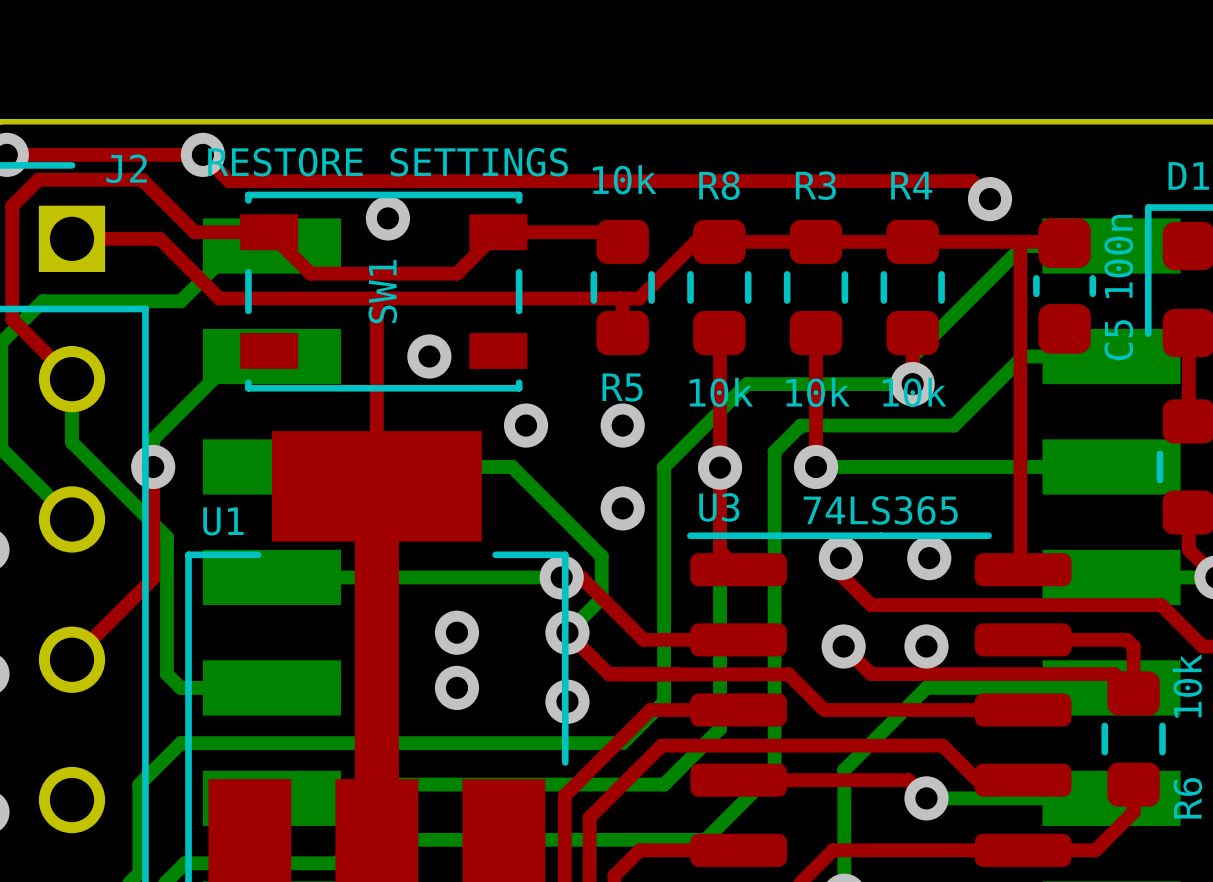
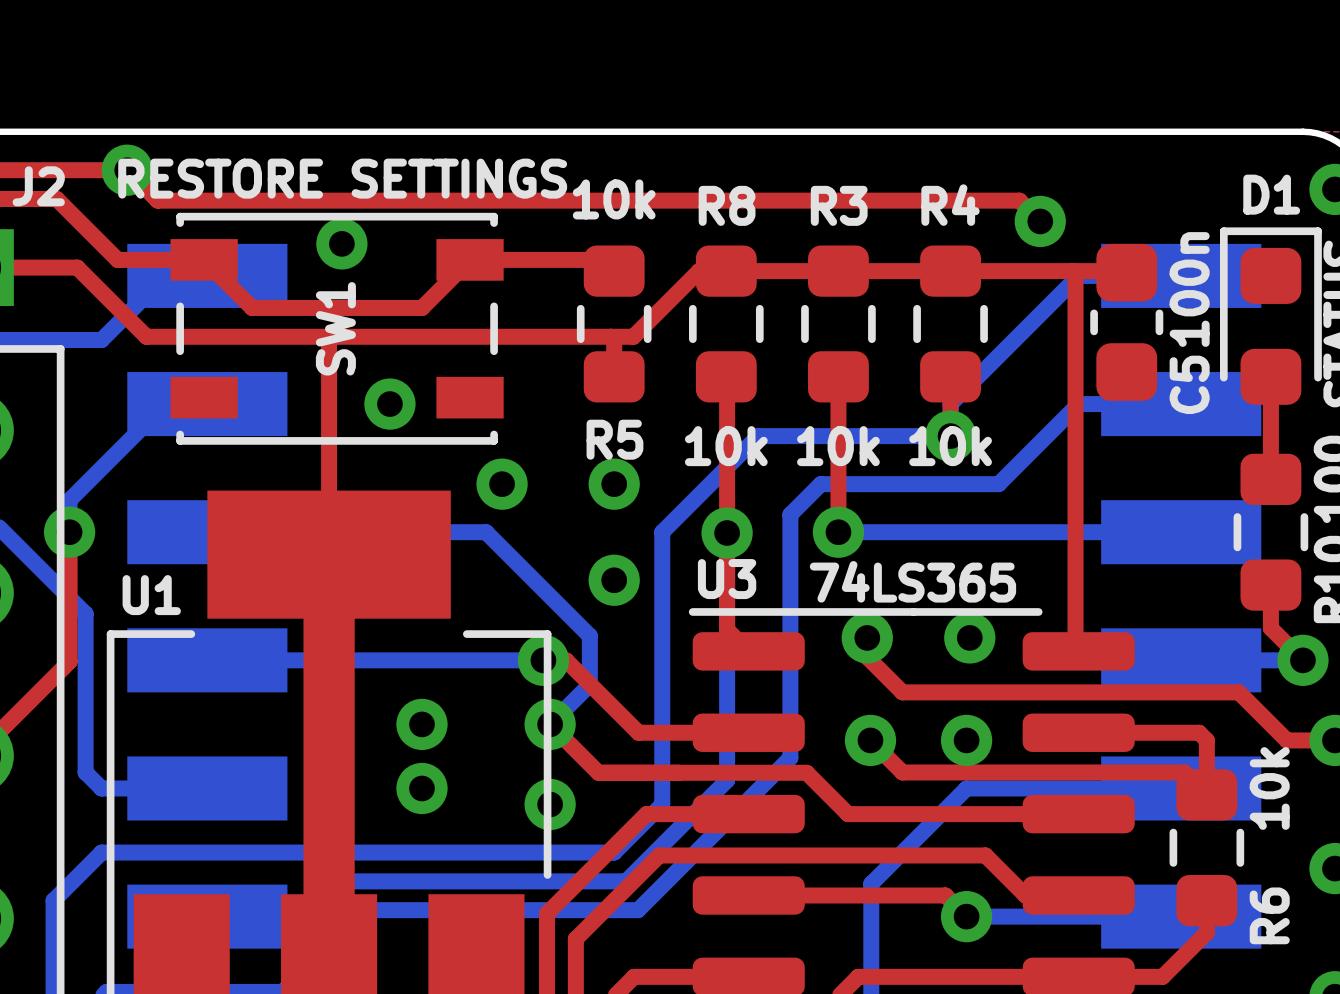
bottom track: (774, 661) (774, 770) (705, 839) (360, 839) -> (790, 757) (638, 910) (364, 910) (309, 964)
bottom track: (720, 680) (720, 728) (664, 784) (374, 784) -> (727, 780) (626, 881) (345, 881) (325, 900)

